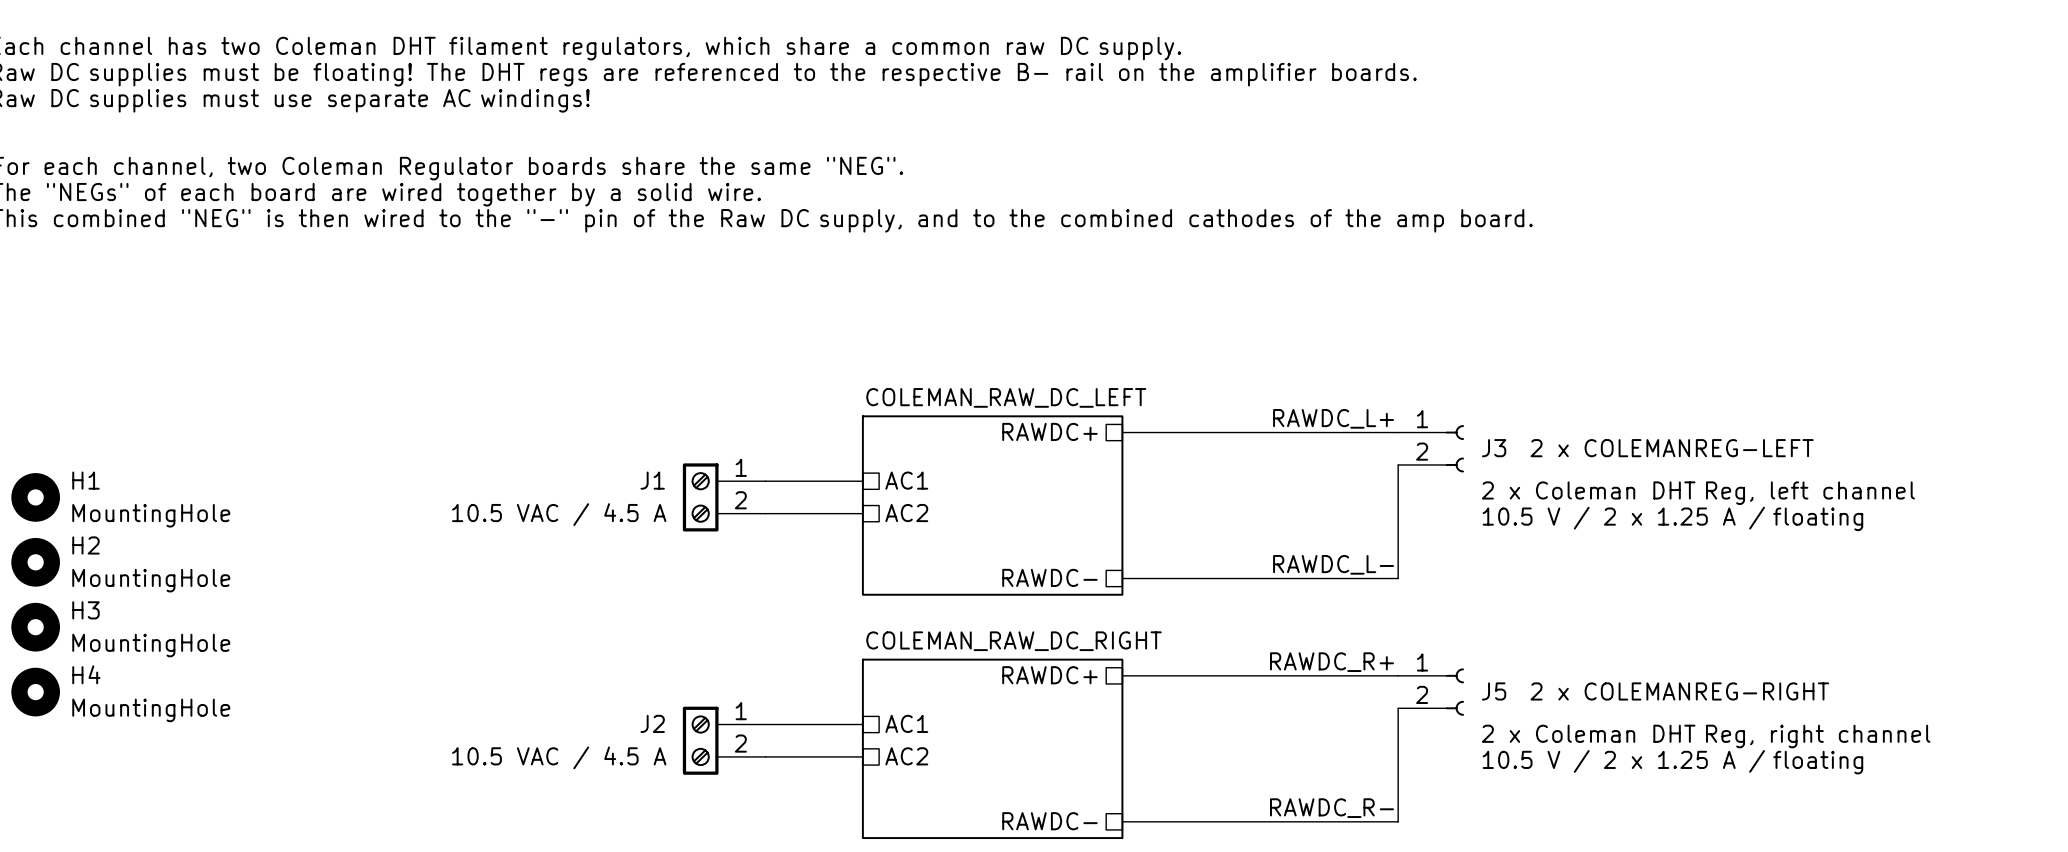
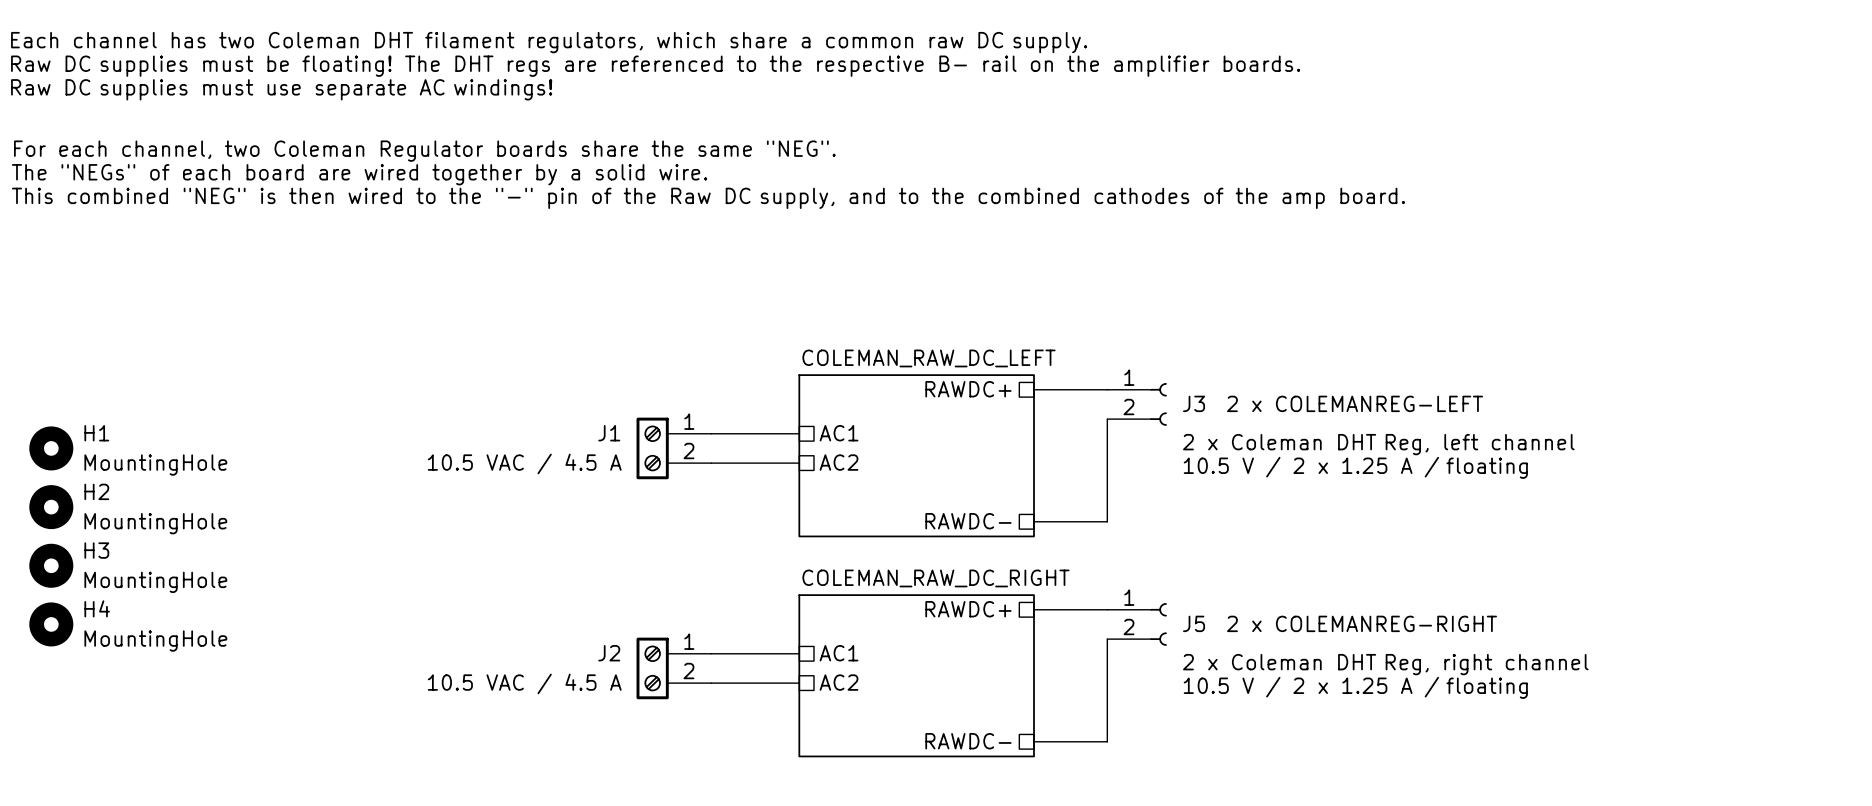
label: RAWDC_L+ (1333, 418) -> none
wire: (1203, 432) (1398, 432) -> none
J3 position: (1431, 448) -> (1137, 404)
wire: (1398, 464) (1398, 578) (1203, 578) -> (1107, 419) (1107, 521)
text position: 2 x Coleman DHT Reg, left channel (1698, 493) -> 2 x Coleman DHT Reg, left channel (1378, 444)
text position: 10.5 V / 2 x 1.25 A / floating (1672, 518) -> 10.5 V / 2 x 1.25 A / floating (1355, 467)
label: RAWDC_L- (1333, 564) -> none
label: RAWDC_R+ (1332, 662) -> none
wire: (1203, 675) (1398, 675) -> none
J5 position: (1431, 692) -> (1137, 624)
wire: (1398, 708) (1398, 821) (1203, 821) -> (1107, 639) (1107, 741)
text position: 2 x Coleman DHT Reg, right channel (1706, 736) -> 2 x Coleman DHT Reg, right channel (1385, 664)
text position: 10.5 V / 2 x 1.25 A / floating (1672, 762) -> 10.5 V / 2 x 1.25 A / floating (1355, 687)
label: RAWDC_R- (1332, 808) -> none

